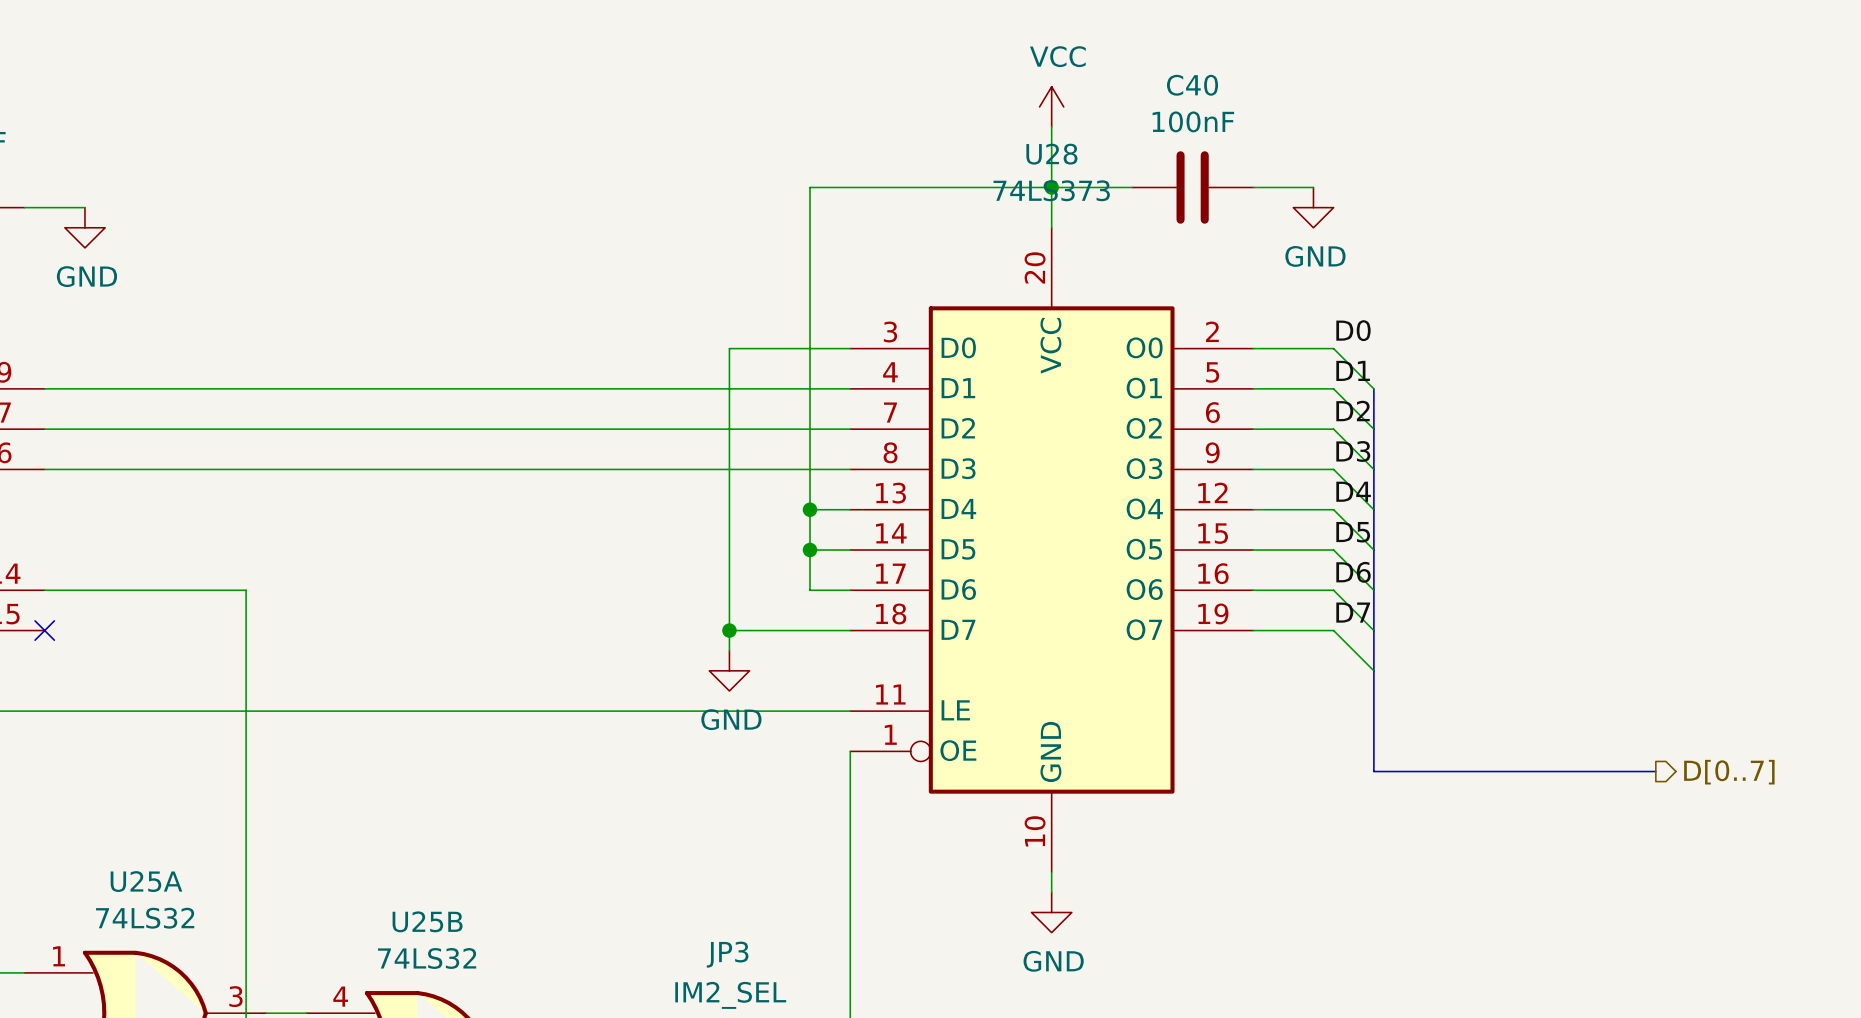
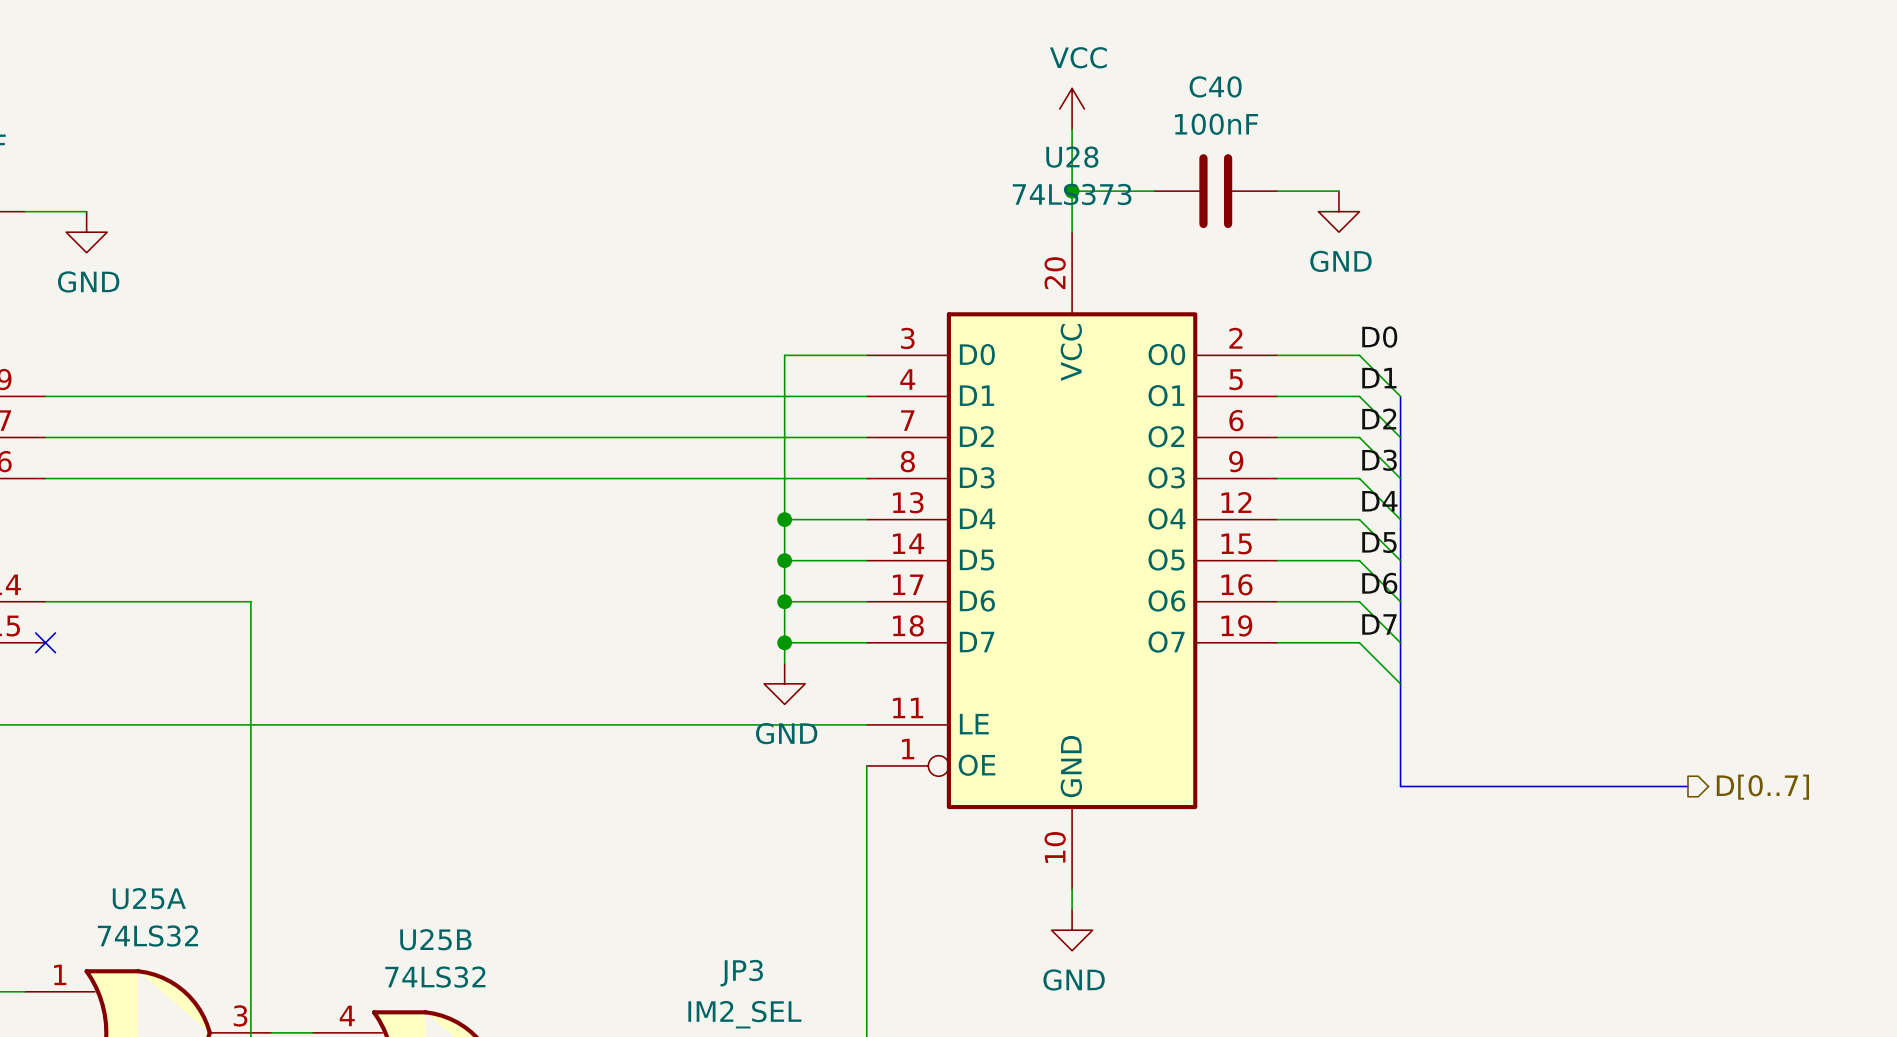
wire: (1051, 187) (809, 187) (809, 590) -> (784, 601) (825, 601)
wire: (769, 348) (729, 348) (729, 650) -> (784, 355) (784, 663)
wire: none -> (784, 519) (825, 519)
junction: none -> (784, 519)
junction: (809, 509) -> none
junction: none -> (784, 560)
junction: (809, 550) -> none
junction: none -> (784, 601)
wire: (729, 630) (769, 630) -> (784, 560) (825, 560)
junction: (729, 630) -> none
junction: none -> (784, 642)
power symbol position: GND (729, 670) -> GND (784, 683)

